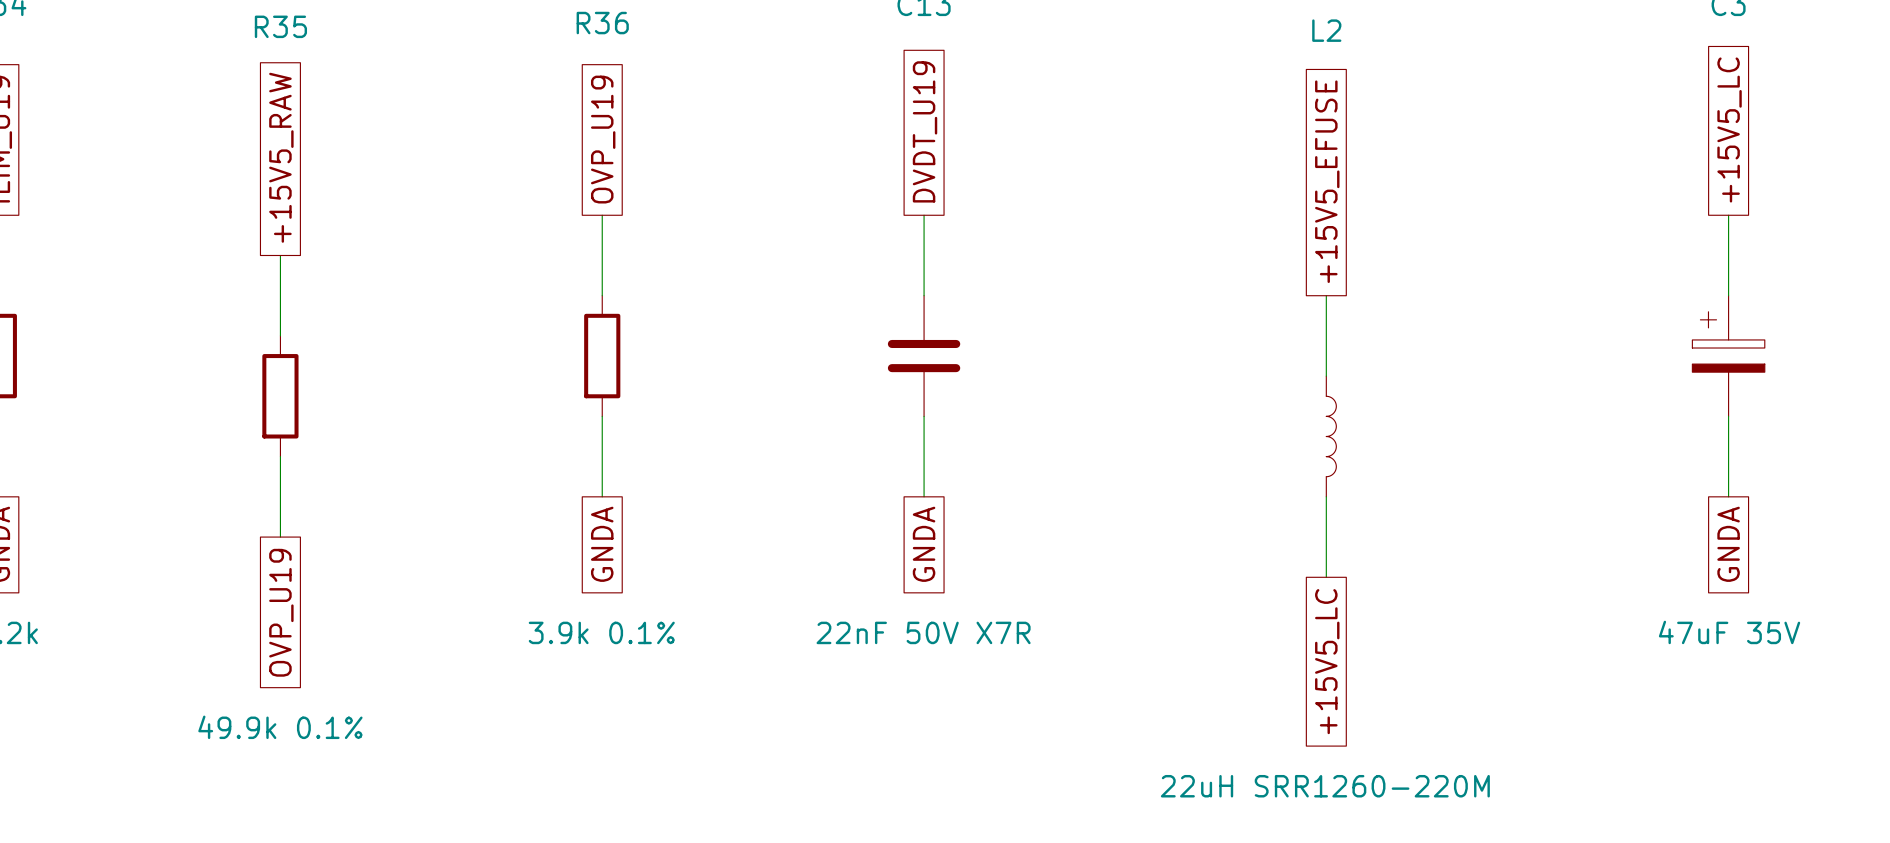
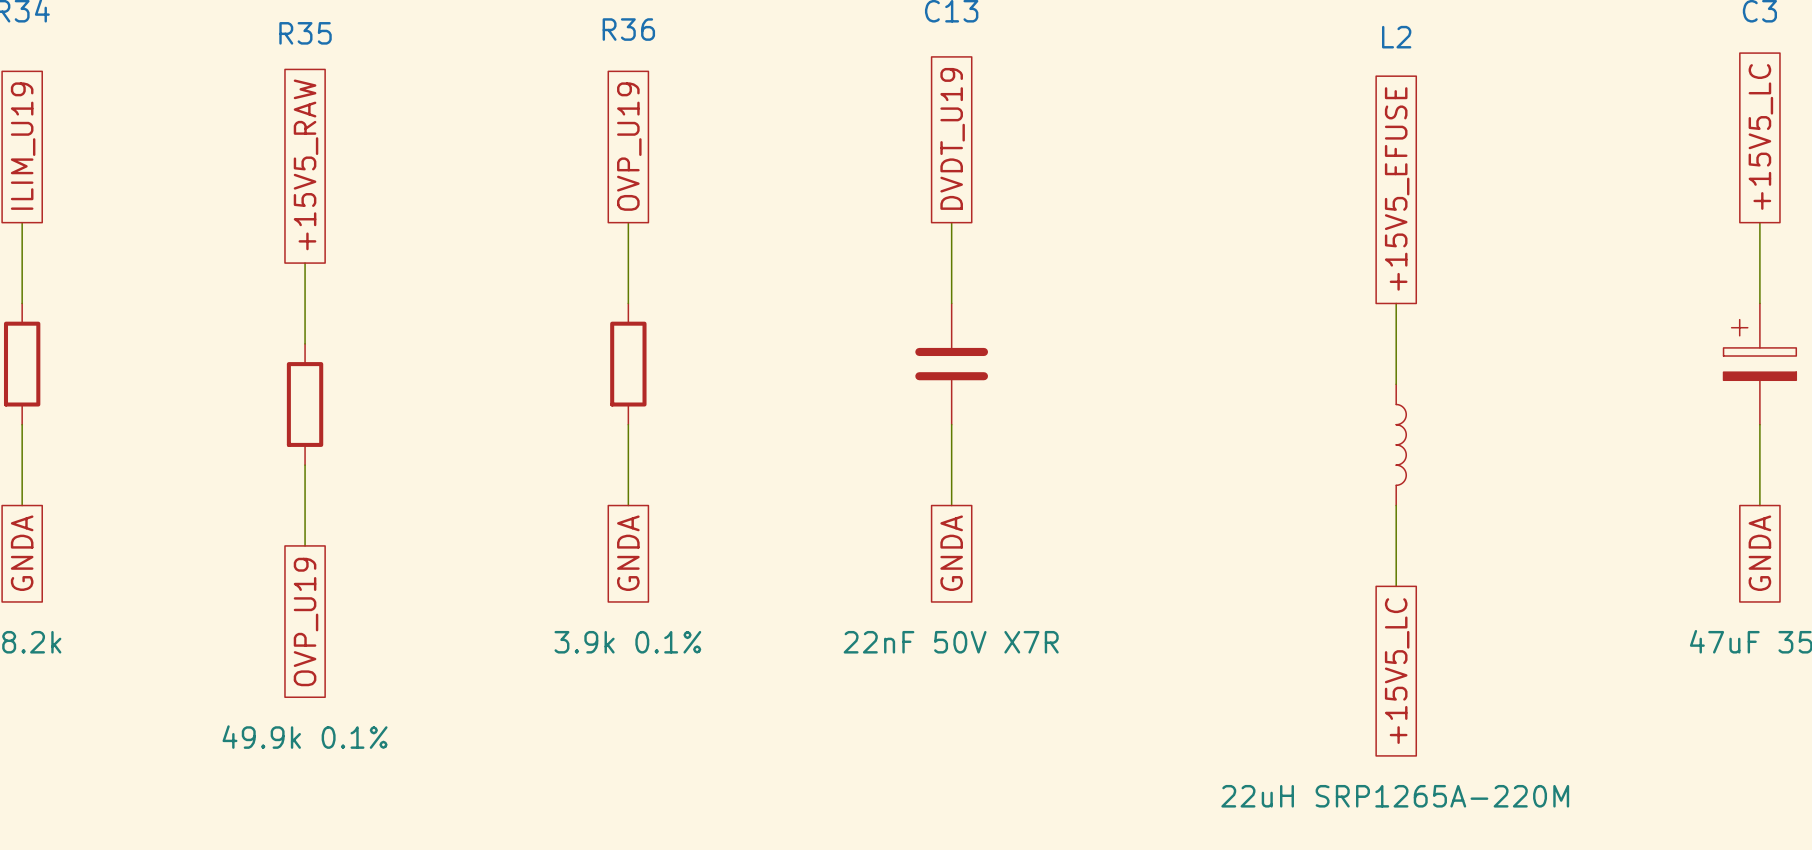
global label position: +15V5_EFUSE (1327, 181) -> +15V5_EFUSE (1397, 188)
wire: (1326, 295) (1326, 376) -> (1396, 303) (1396, 384)
L2 position: (1331, 436) -> (1401, 444)
wire: (1326, 496) (1326, 577) -> (1396, 505) (1396, 586)
global label position: +15V5_LC (1327, 661) -> +15V5_LC (1397, 671)
L2 value: 22uH SRR1260-220M (1325, 786) -> 22uH SRP1265A-220M (1395, 796)

